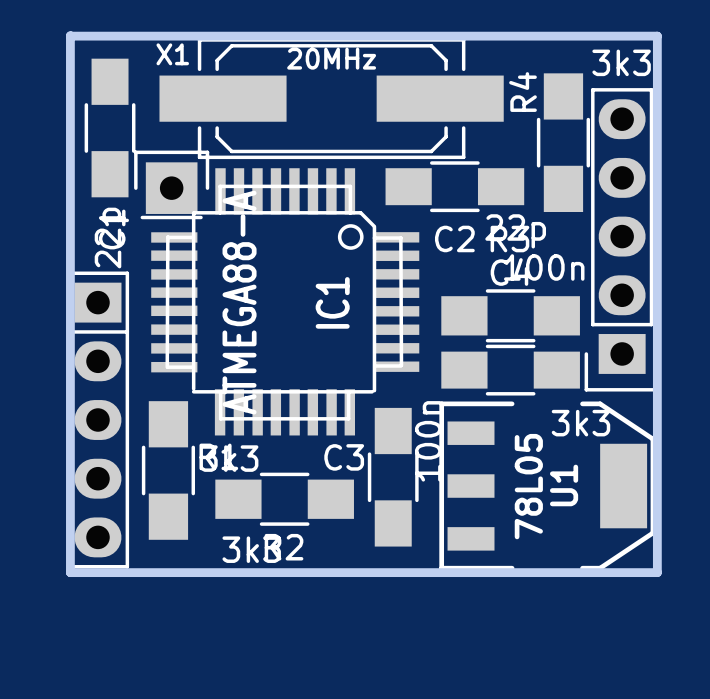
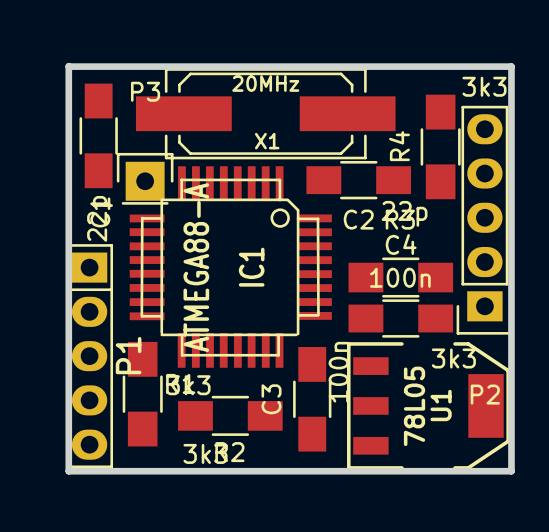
X1 name position: X1 (172, 54) -> X1 (267, 141)
P3 name: none -> P3 (145, 91)
R4 name position: R4 (523, 92) -> R4 (399, 146)
C4 value position: 100n (544, 267) -> 100n (400, 277)
IC1 name position: IC1 (332, 302) -> IC1 (251, 267)
P1 name: none -> P1 (128, 355)
C3 name rotation: 0° (344, 457) -> 90° counterclockwise (271, 399)
P2 name: none -> P2 (485, 394)

